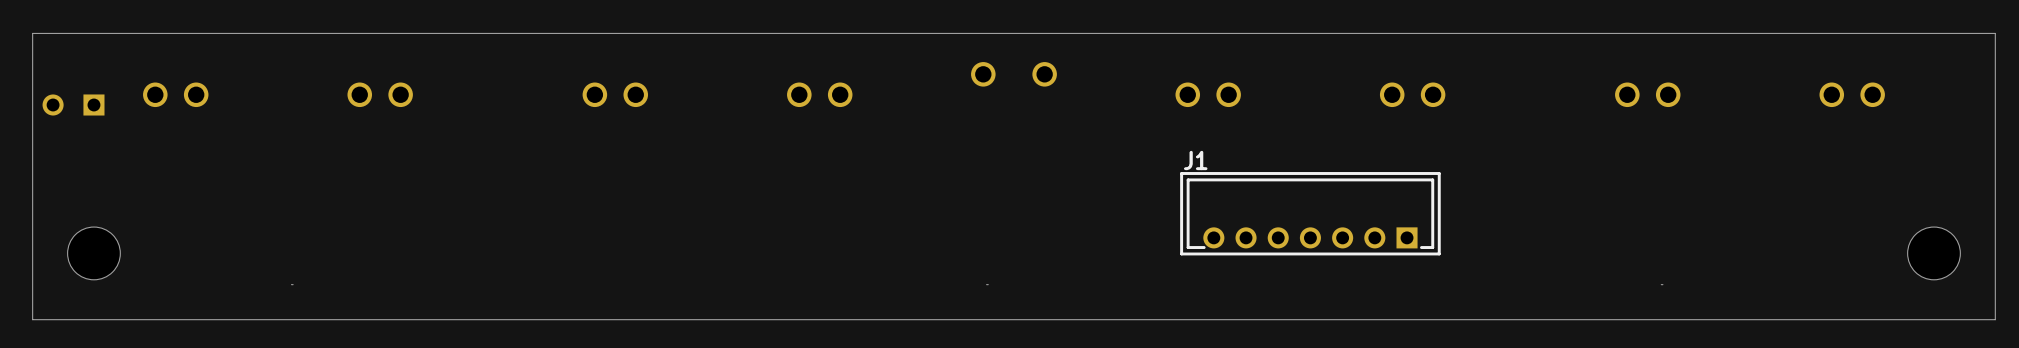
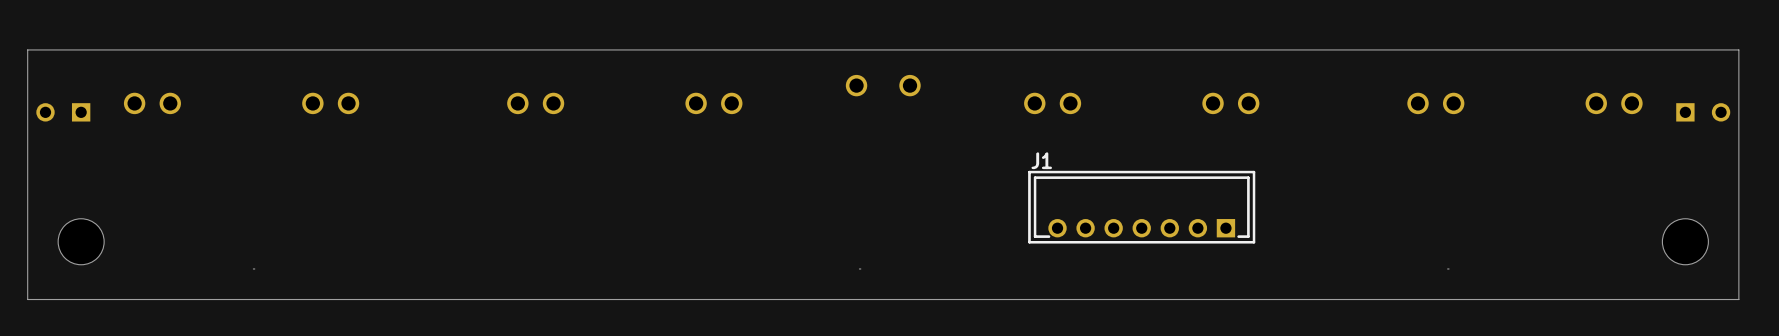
part: none -> (1703, 112)

